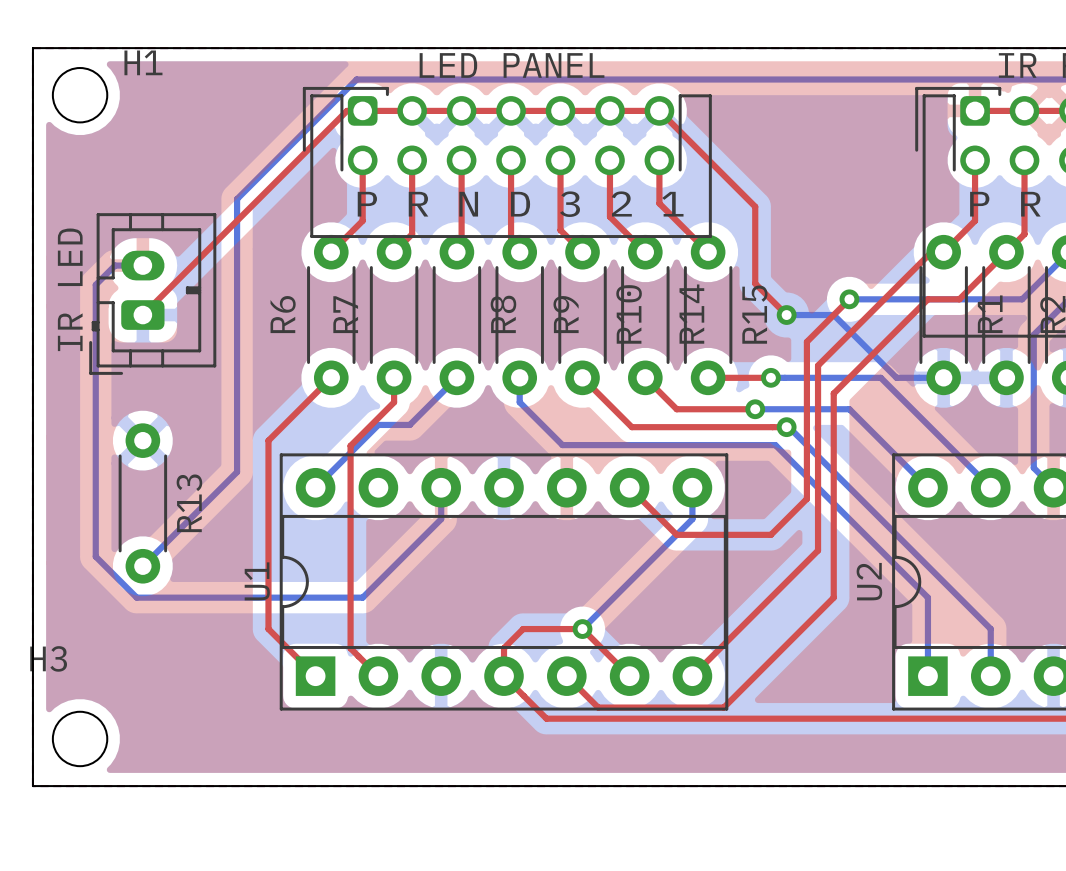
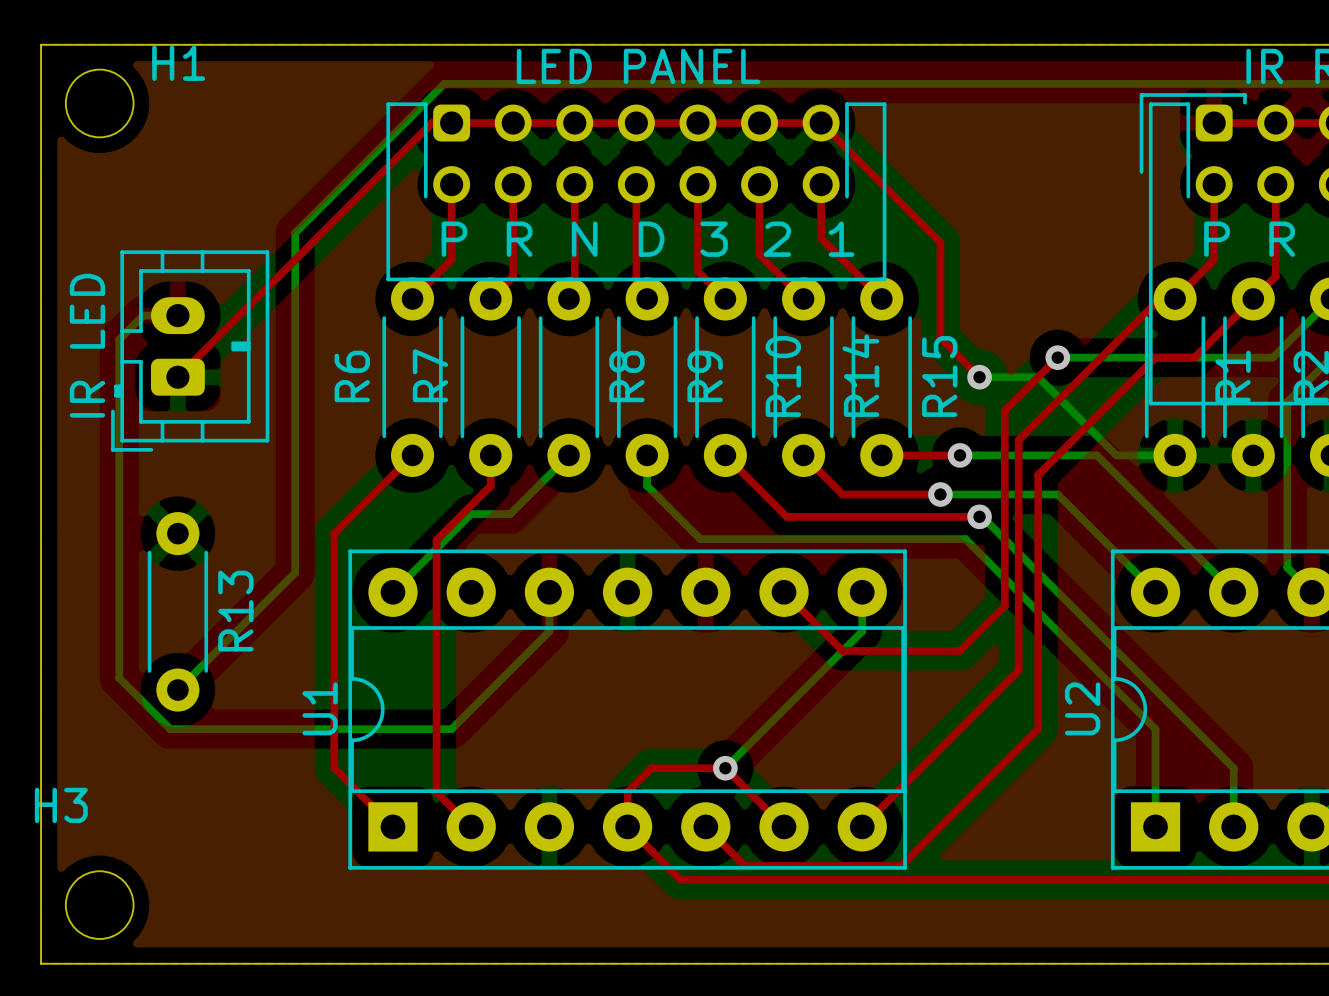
LED PANEL footprint: [302, 86, 712, 239] -> [386, 102, 887, 282]

